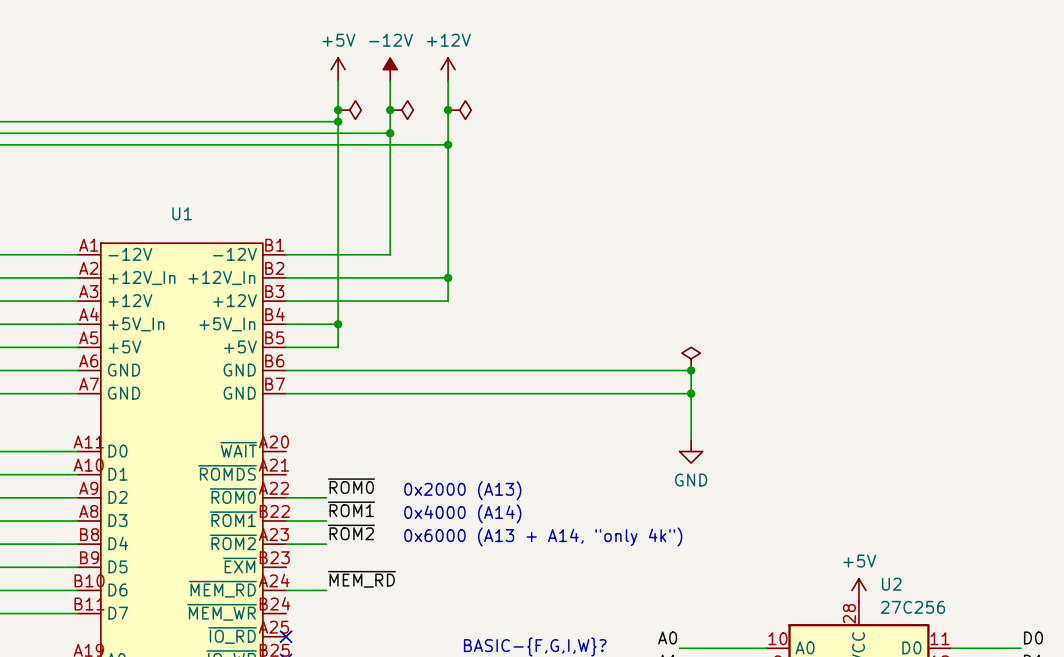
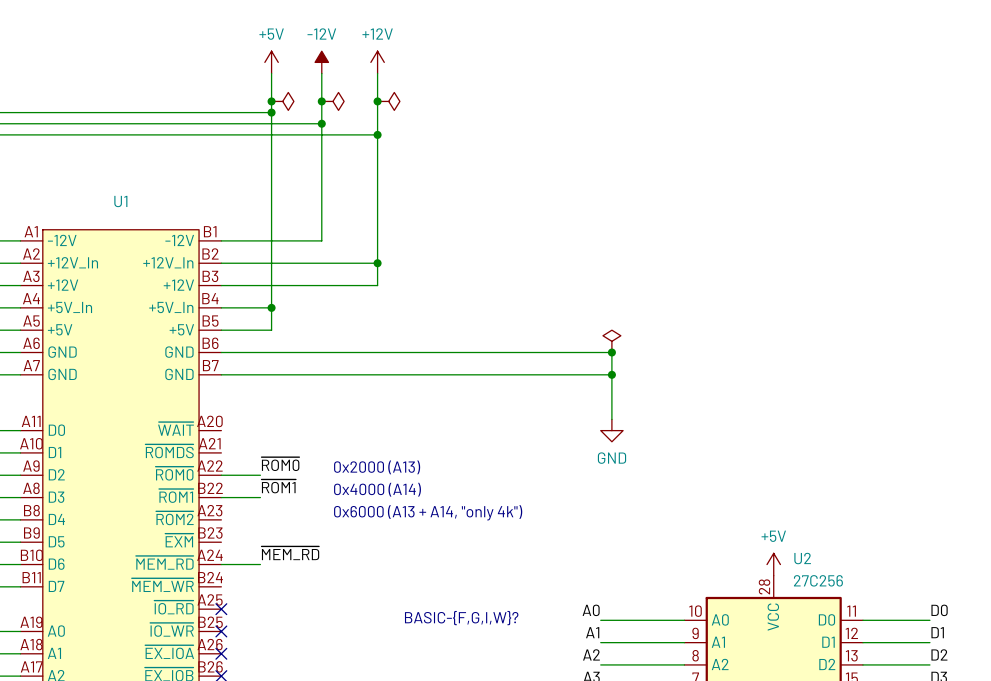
label: ~{ROM2} (351, 532) -> none
wire: (286, 544) (326, 544) -> none

